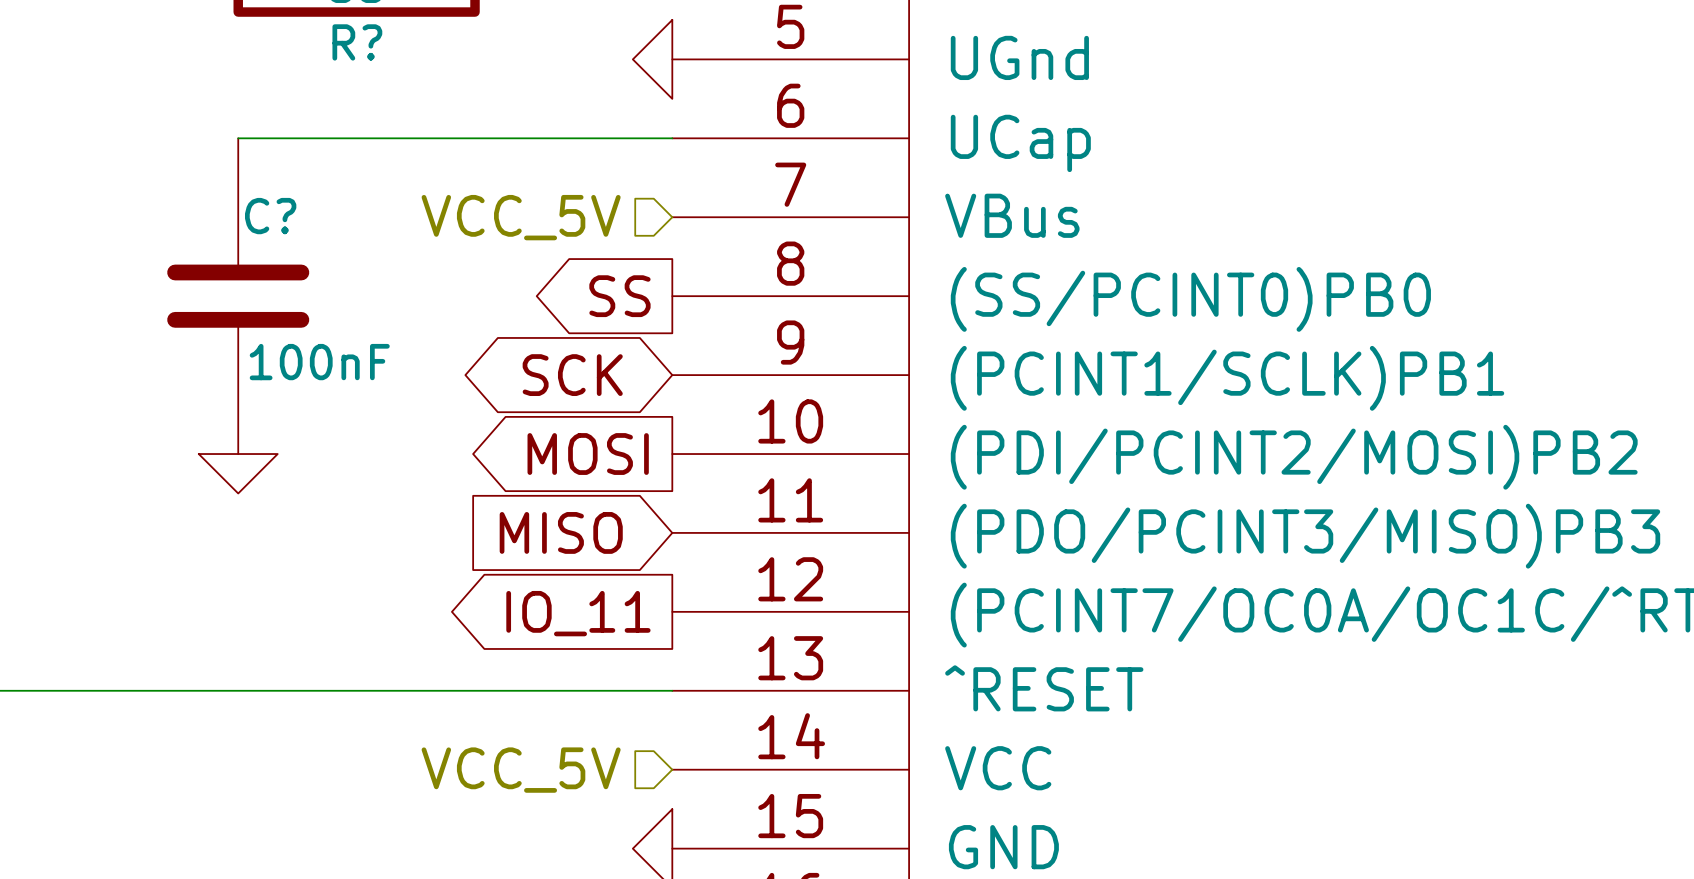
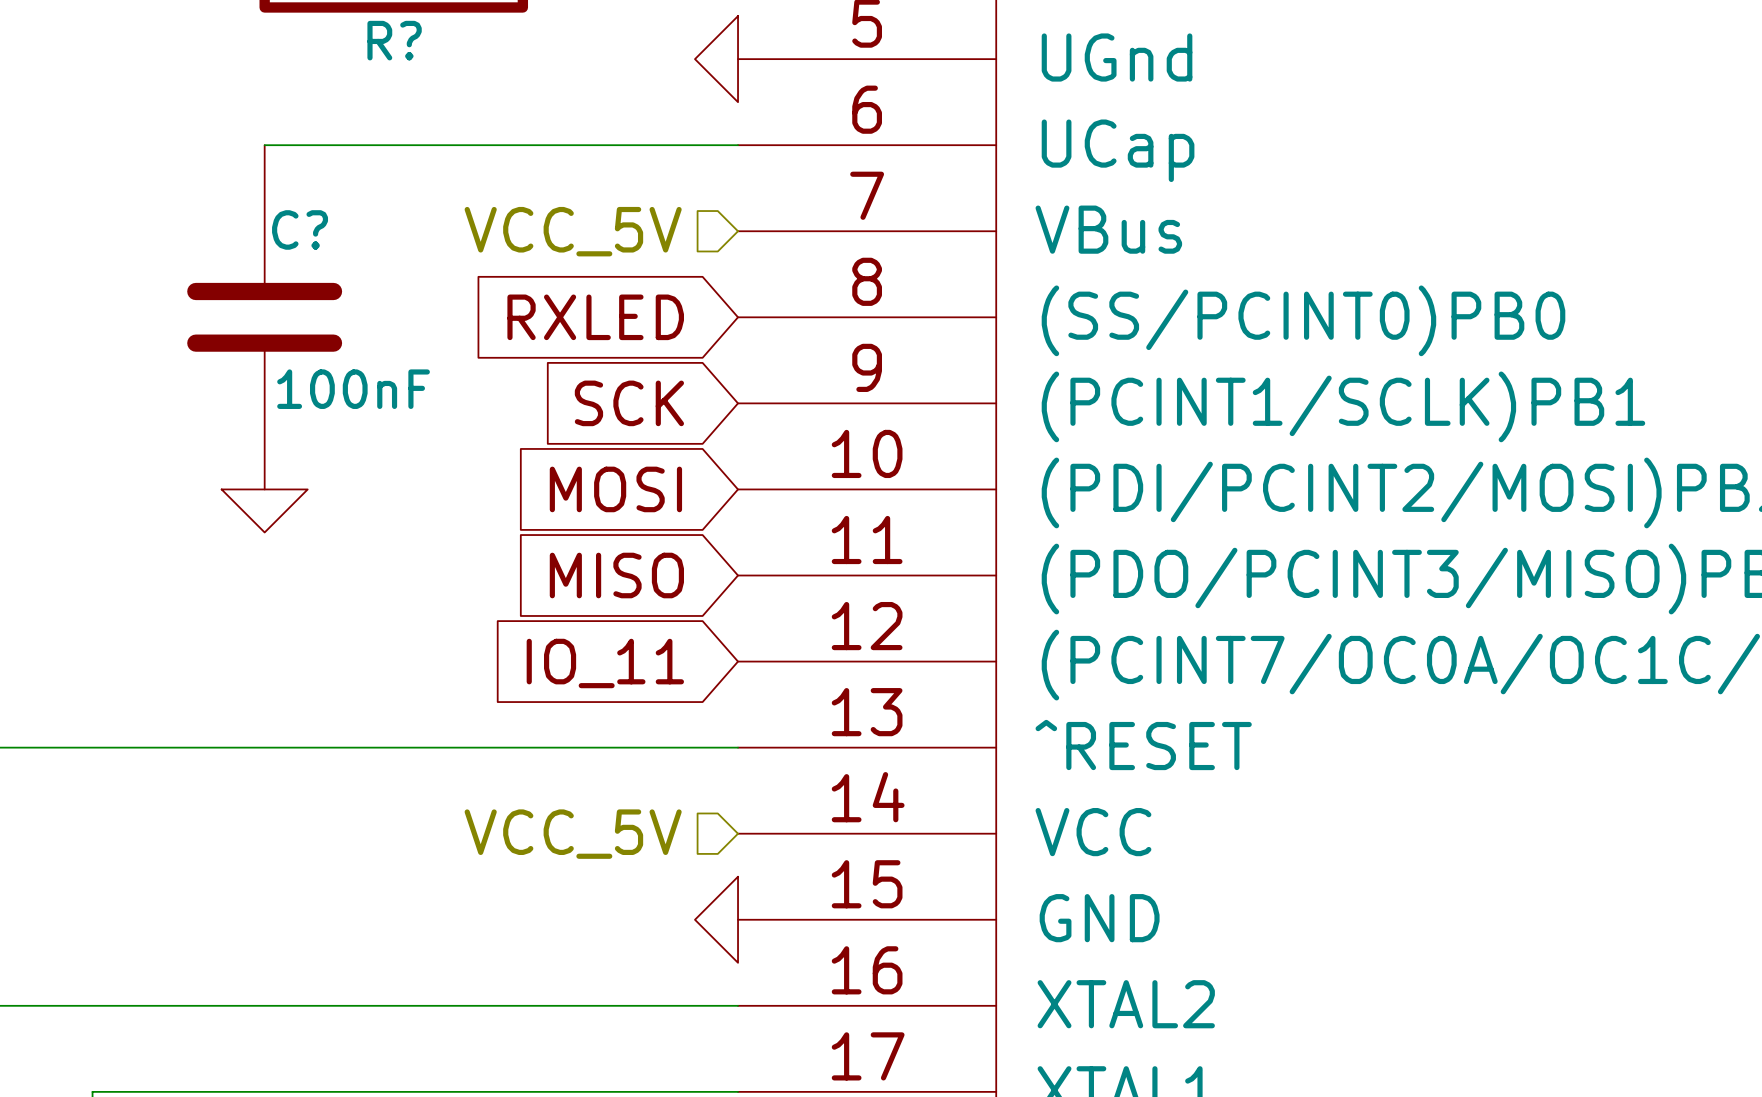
global label shape: output (619, 296) -> input (595, 317)
global label: SS (619, 296) -> RXLED (595, 317)
global label shape: bidirectional (572, 375) -> input (629, 403)
global label shape: output (588, 454) -> input (615, 489)
global label shape: output (578, 613) -> input (605, 663)

